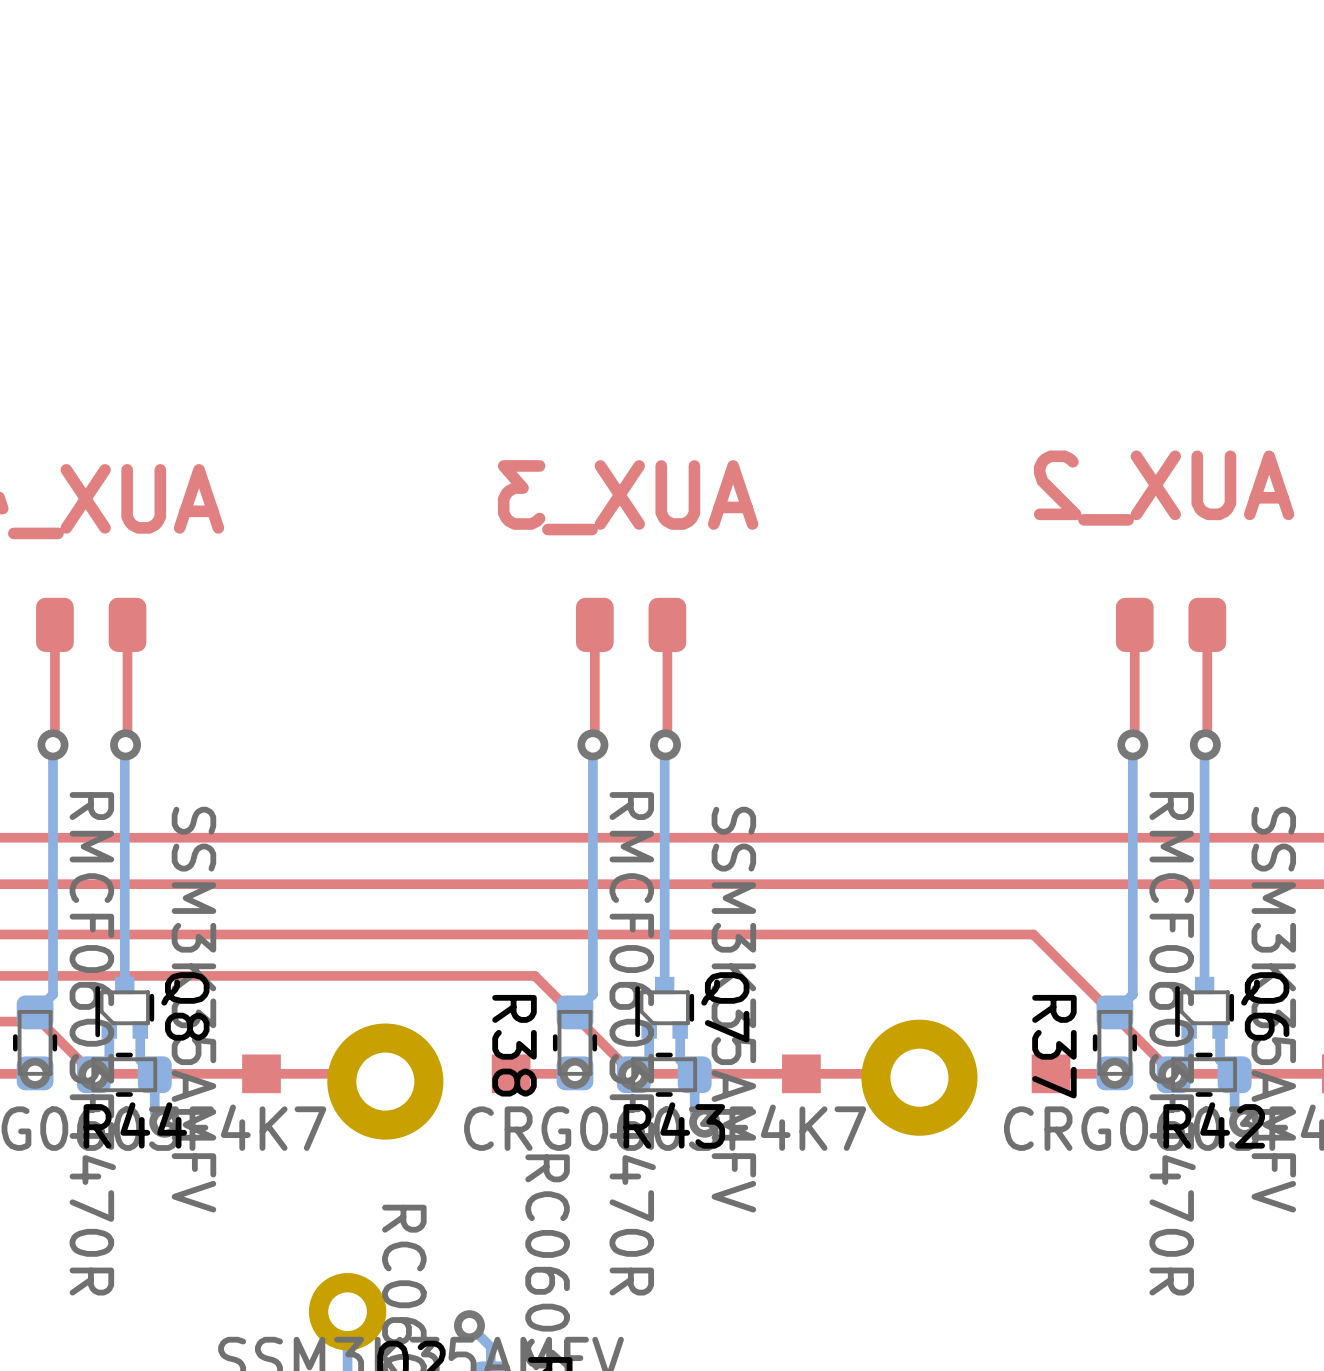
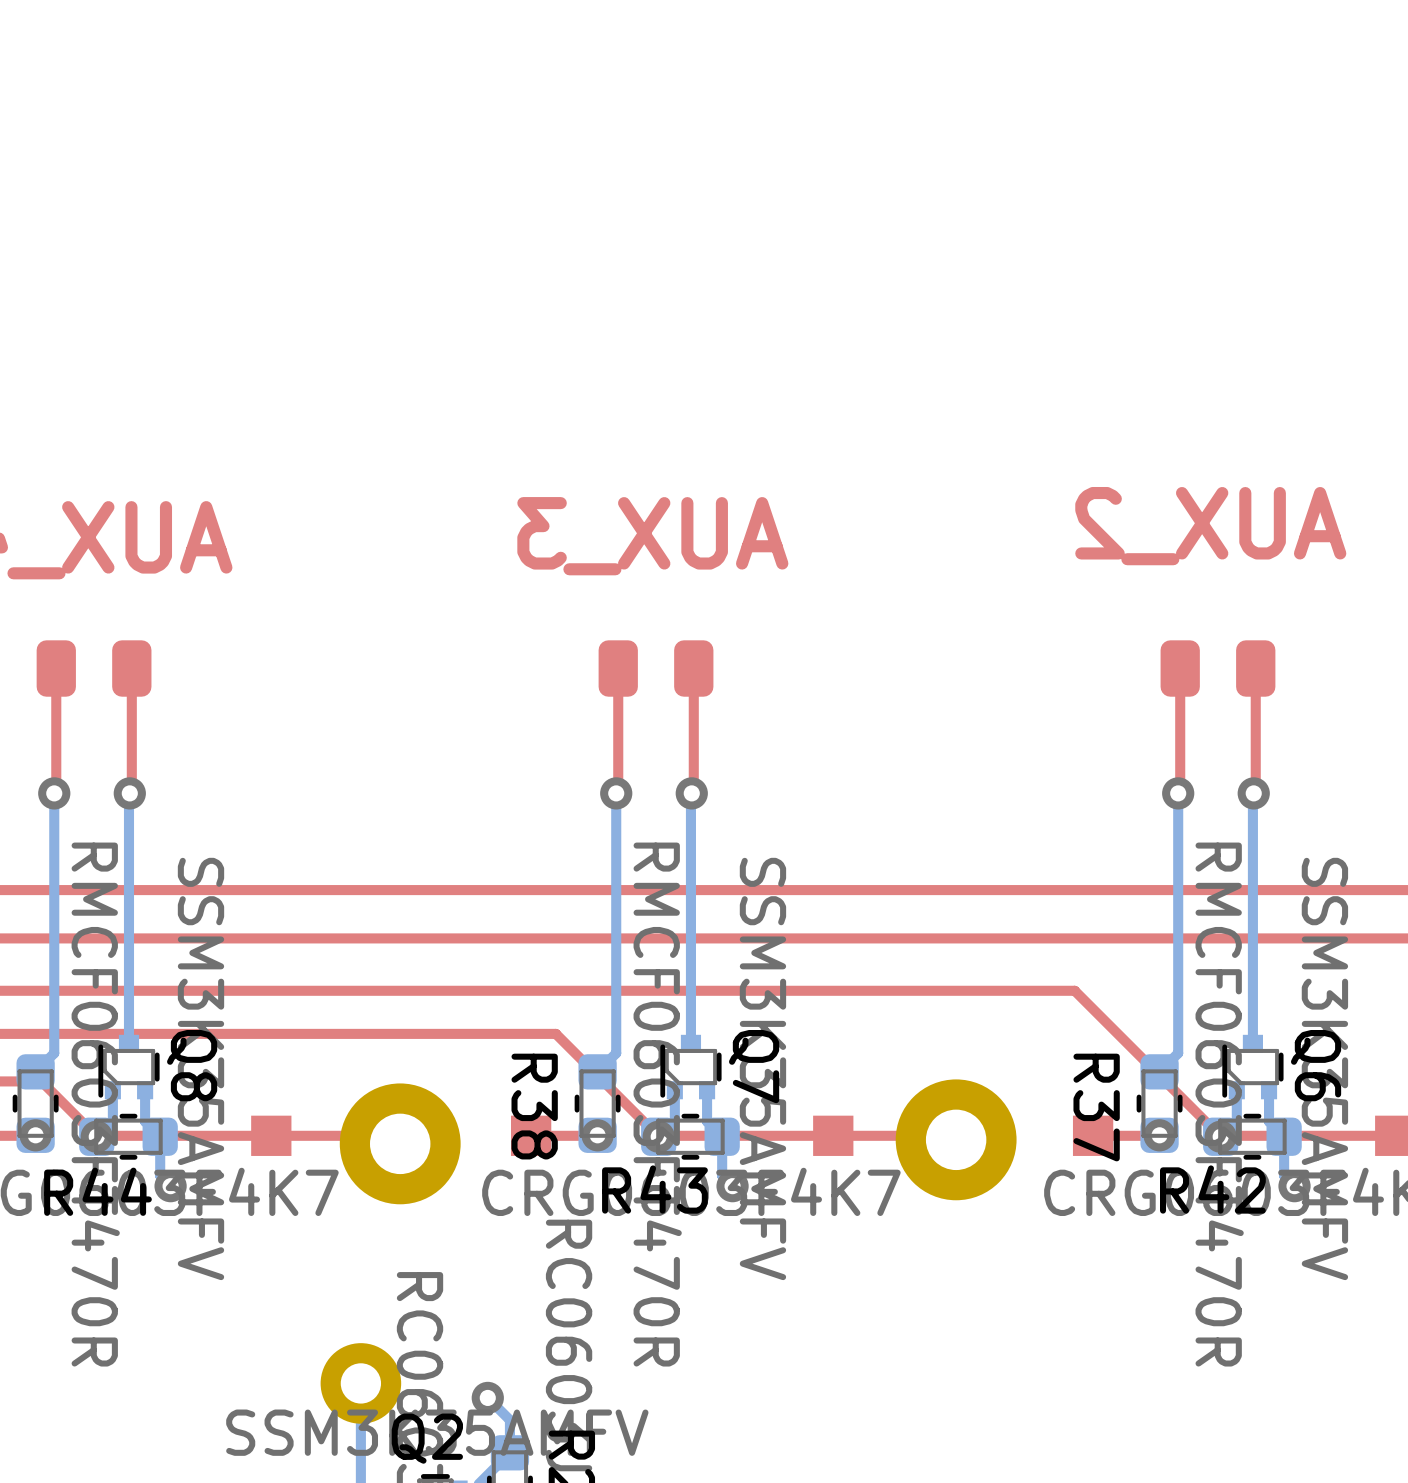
R44 name position: R44 (135, 1125) -> R44 (97, 1191)
R43 name position: R43 (674, 1125) -> R43 (654, 1189)
R42 name position: R42 (1214, 1125) -> R42 (1212, 1189)

